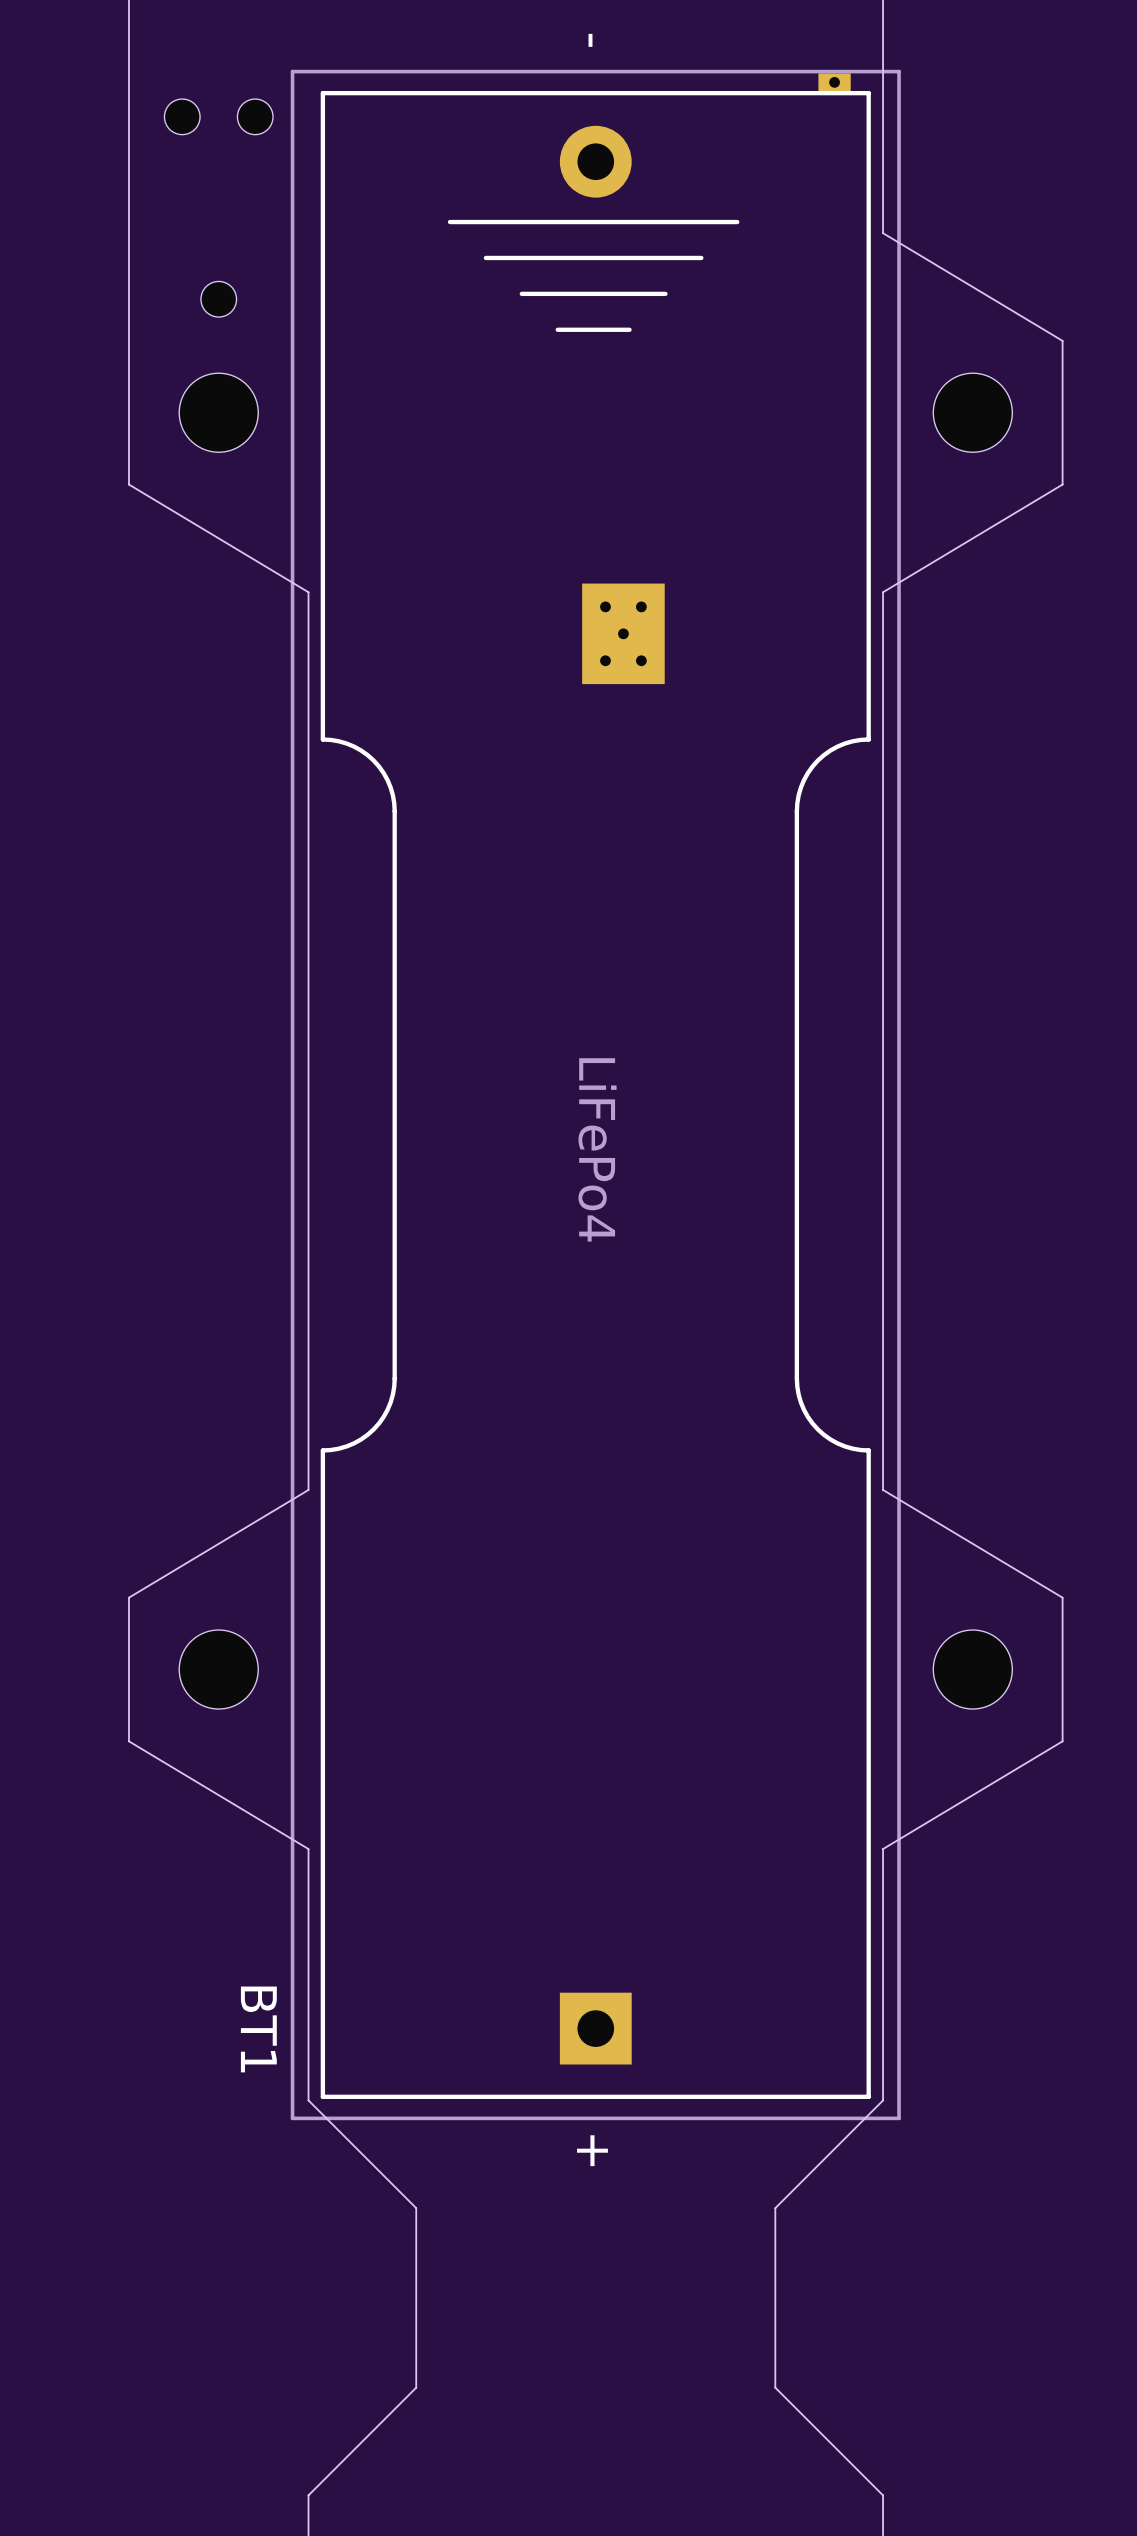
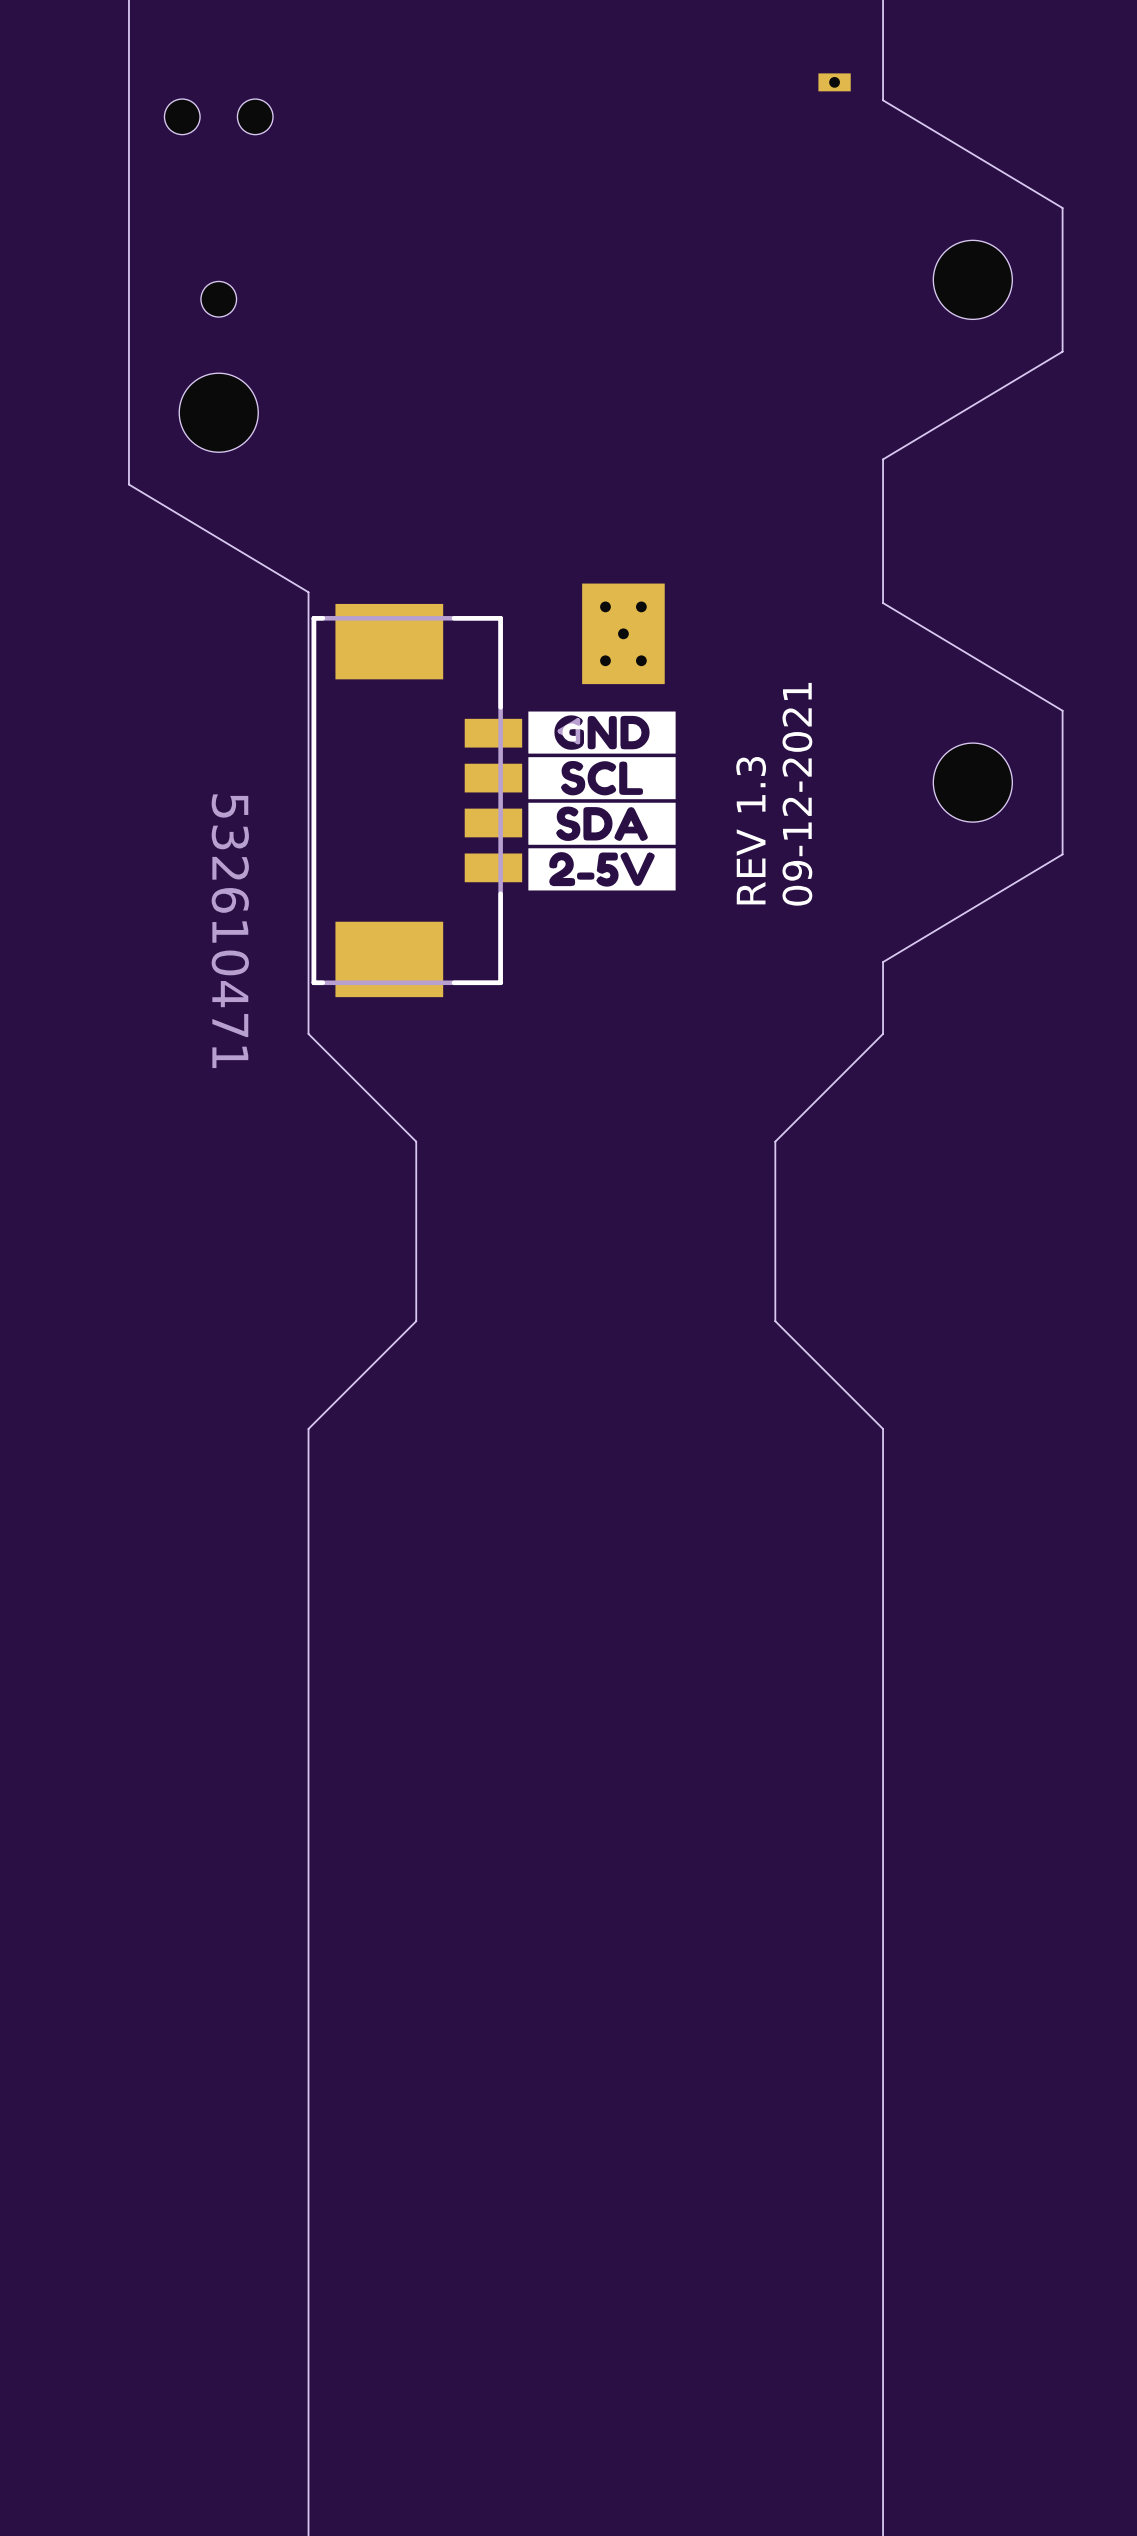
board edge: (883, 100) (883, 233) (1062, 340) -> (883, 100) (1062, 208) (1062, 340)
board edge: (1062, 351) (1062, 484) (883, 592) -> (1062, 351) (883, 459) (883, 592)
part position: (972, 412) -> (972, 279)
board edge: (883, 603) (883, 962) -> (883, 603) (1062, 710) (1062, 854) (883, 962)
drawing: none -> [528, 711, 676, 891]
part: none -> (972, 782)
text: none -> 09-12-2021 (797, 794)
part: none -> 532610471 (445, 800)
text: none -> REV 1.3 (751, 830)
board edge: (308, 1033) (308, 1428) -> (308, 1033) (416, 1141) (416, 1321) (308, 1428)
board edge: (883, 1033) (883, 1428) -> (883, 1033) (775, 1141) (775, 1321) (883, 1428)
BT1: LiFePo4 (595, 1094) -> none
board edge: (308, 1489) (128, 1597) (128, 1741) (308, 1849) -> (308, 1489) (308, 1849)
board edge: (883, 1489) (1062, 1597) (1062, 1741) (883, 1849) -> (883, 1489) (883, 1849)
part: (218, 1669) -> none
part: (972, 1669) -> none
board edge: (308, 2100) (416, 2208) (416, 2387) (308, 2495) -> (308, 2100) (308, 2495)
board edge: (883, 2100) (775, 2208) (775, 2387) (883, 2495) -> (883, 2100) (883, 2495)

